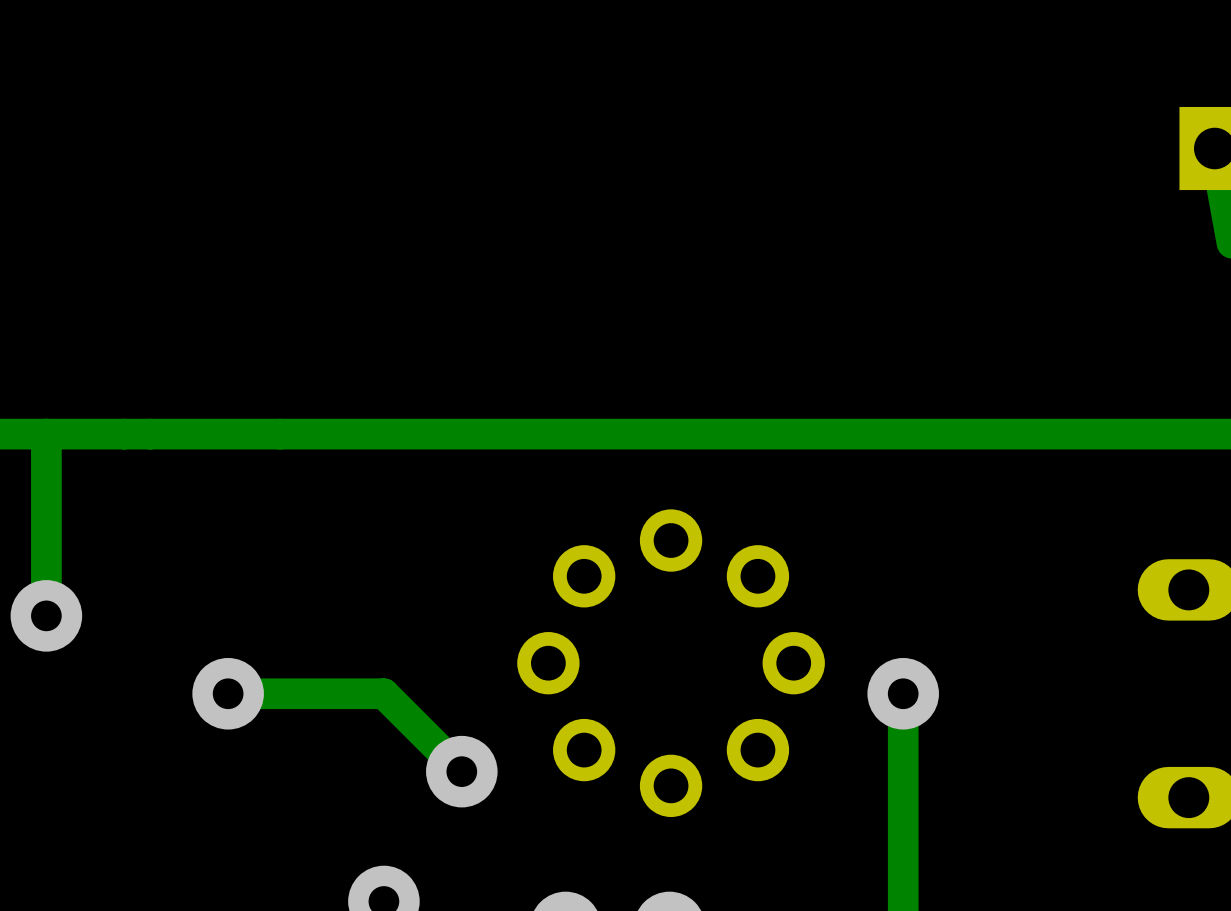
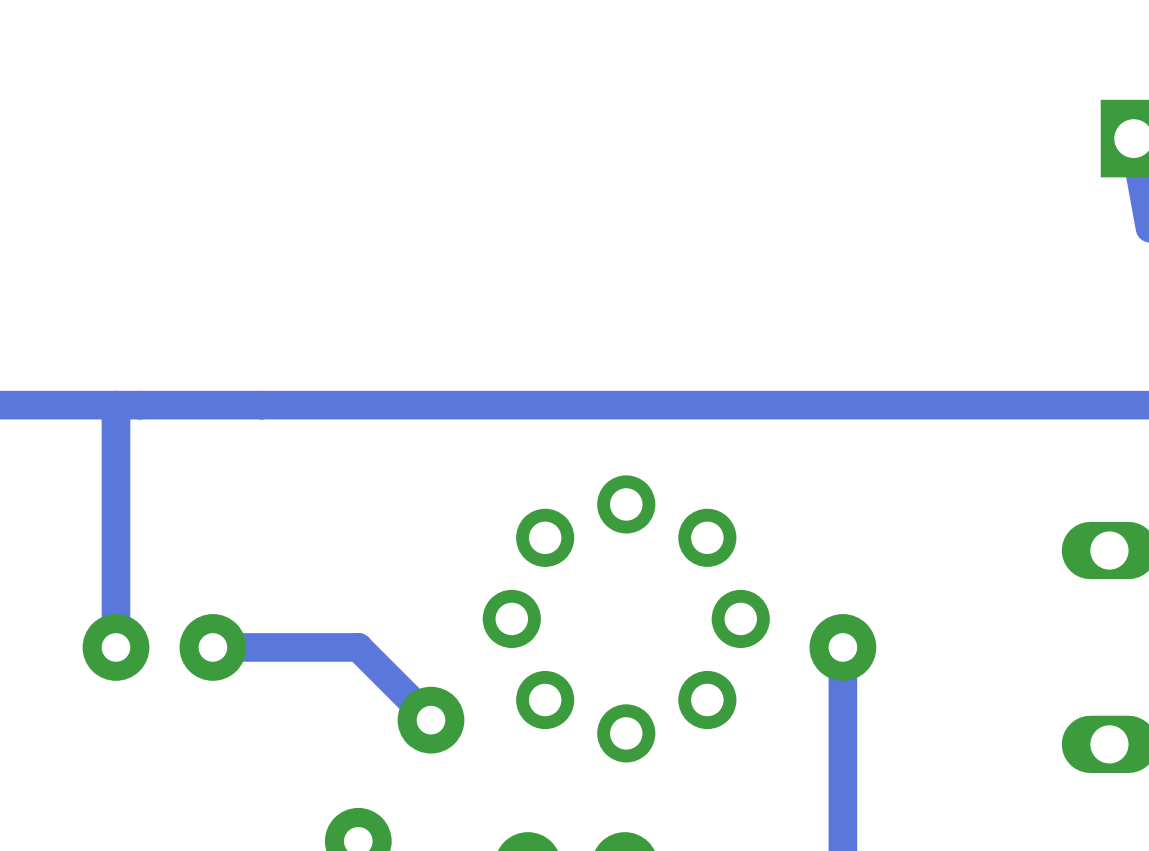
track: (46, 434) (46, 615) -> none
track: none -> (115, 405) (115, 647)
via position: (46, 615) -> (115, 647)

